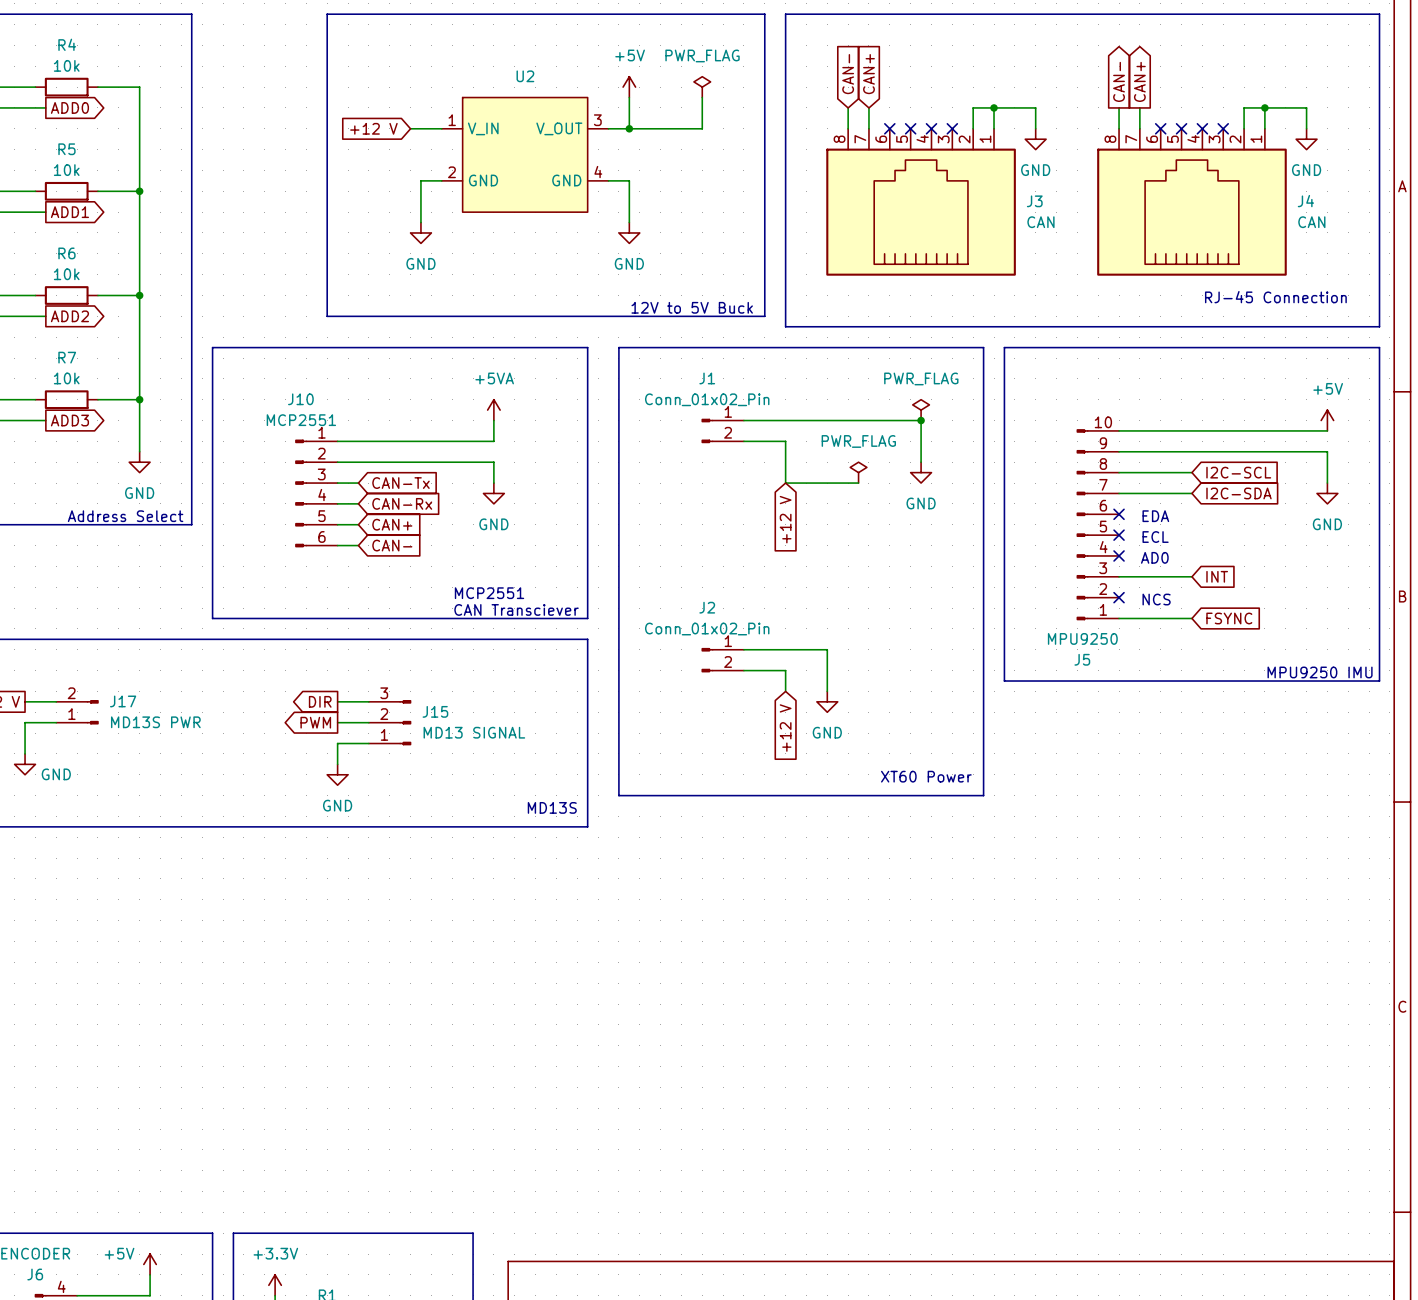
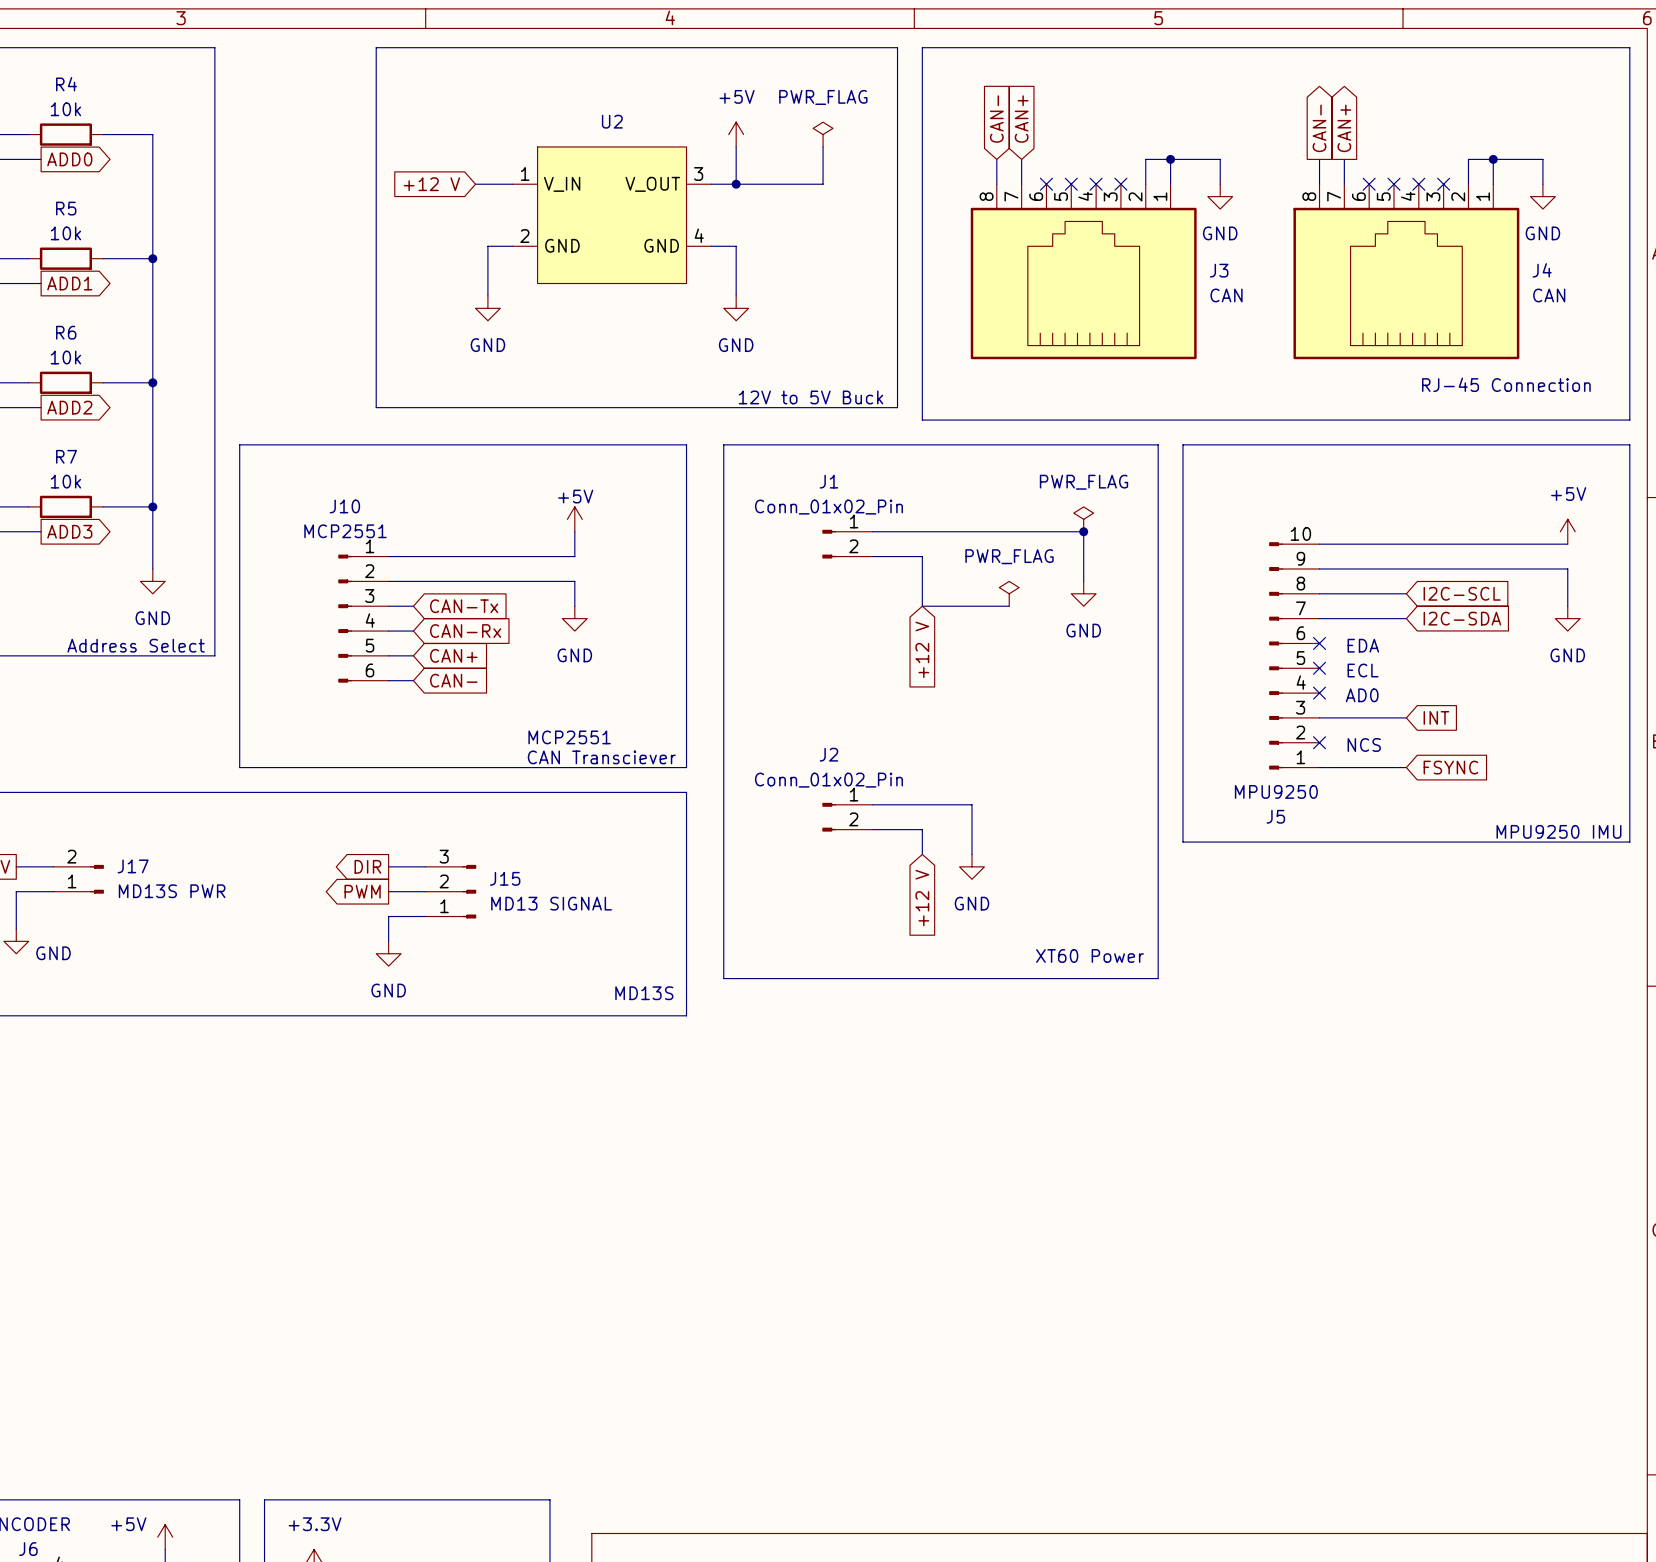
power symbol: +5VA (493, 410) -> +5V (574, 519)

